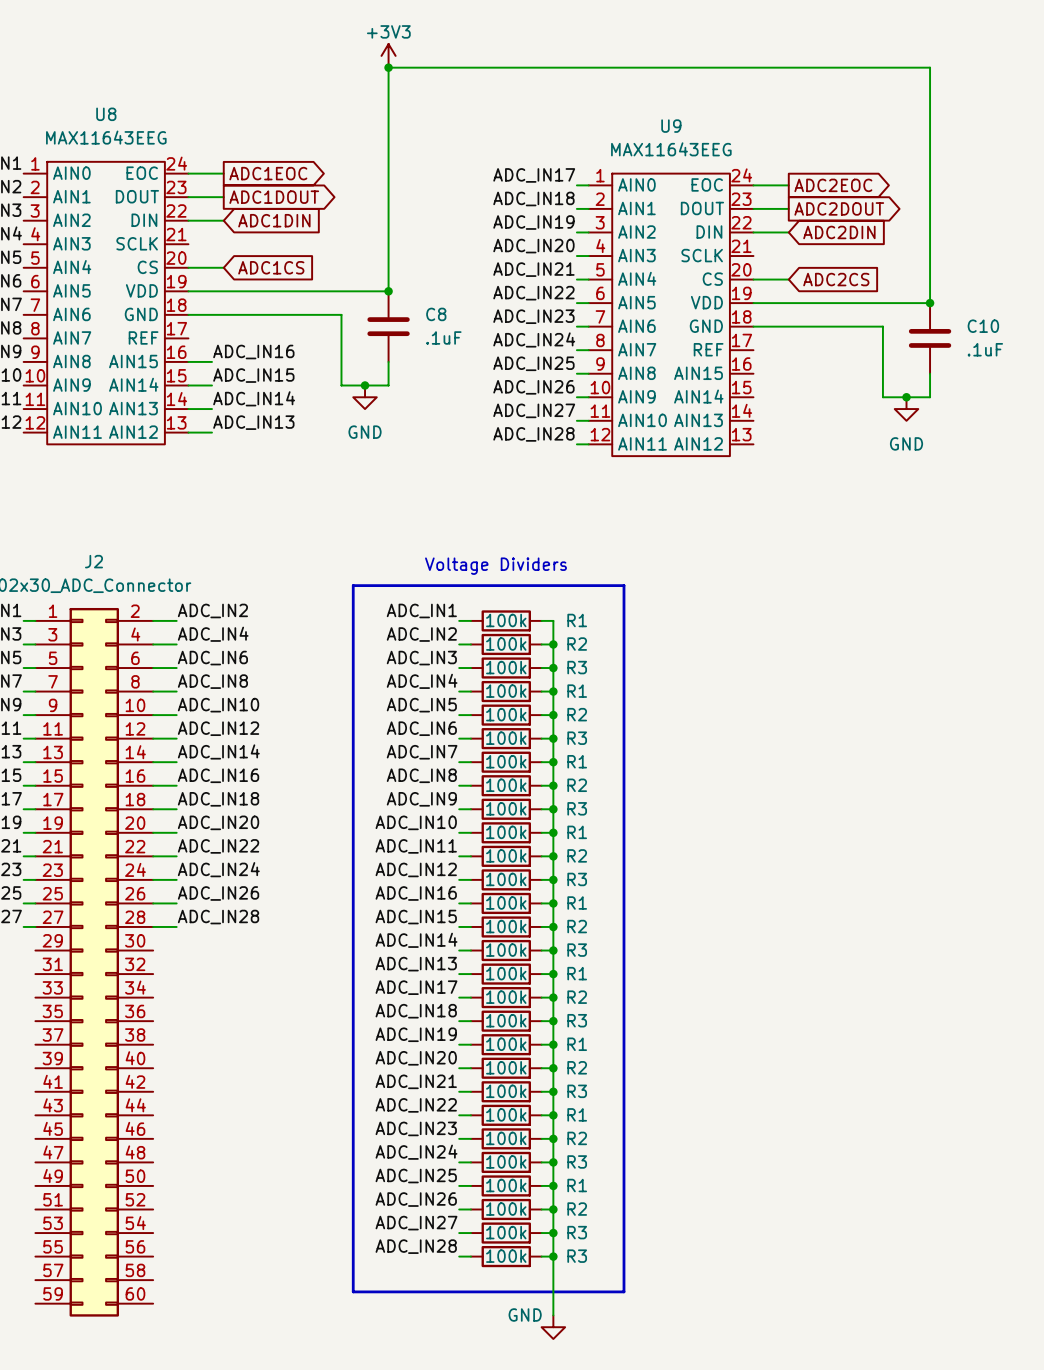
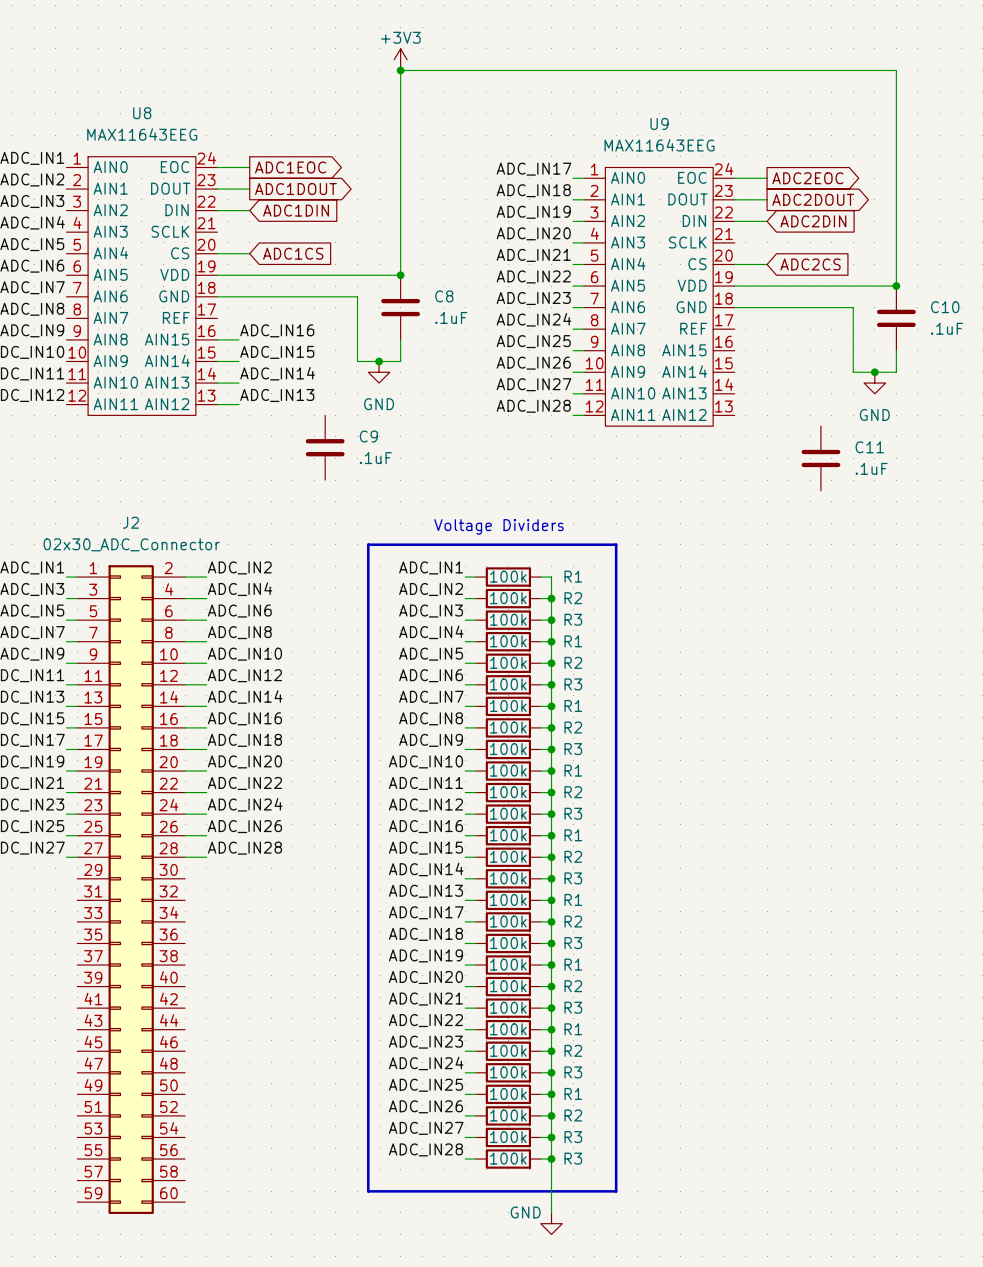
C9: none -> .1uF (325, 447)
C11: none -> .1uF (820, 458)

